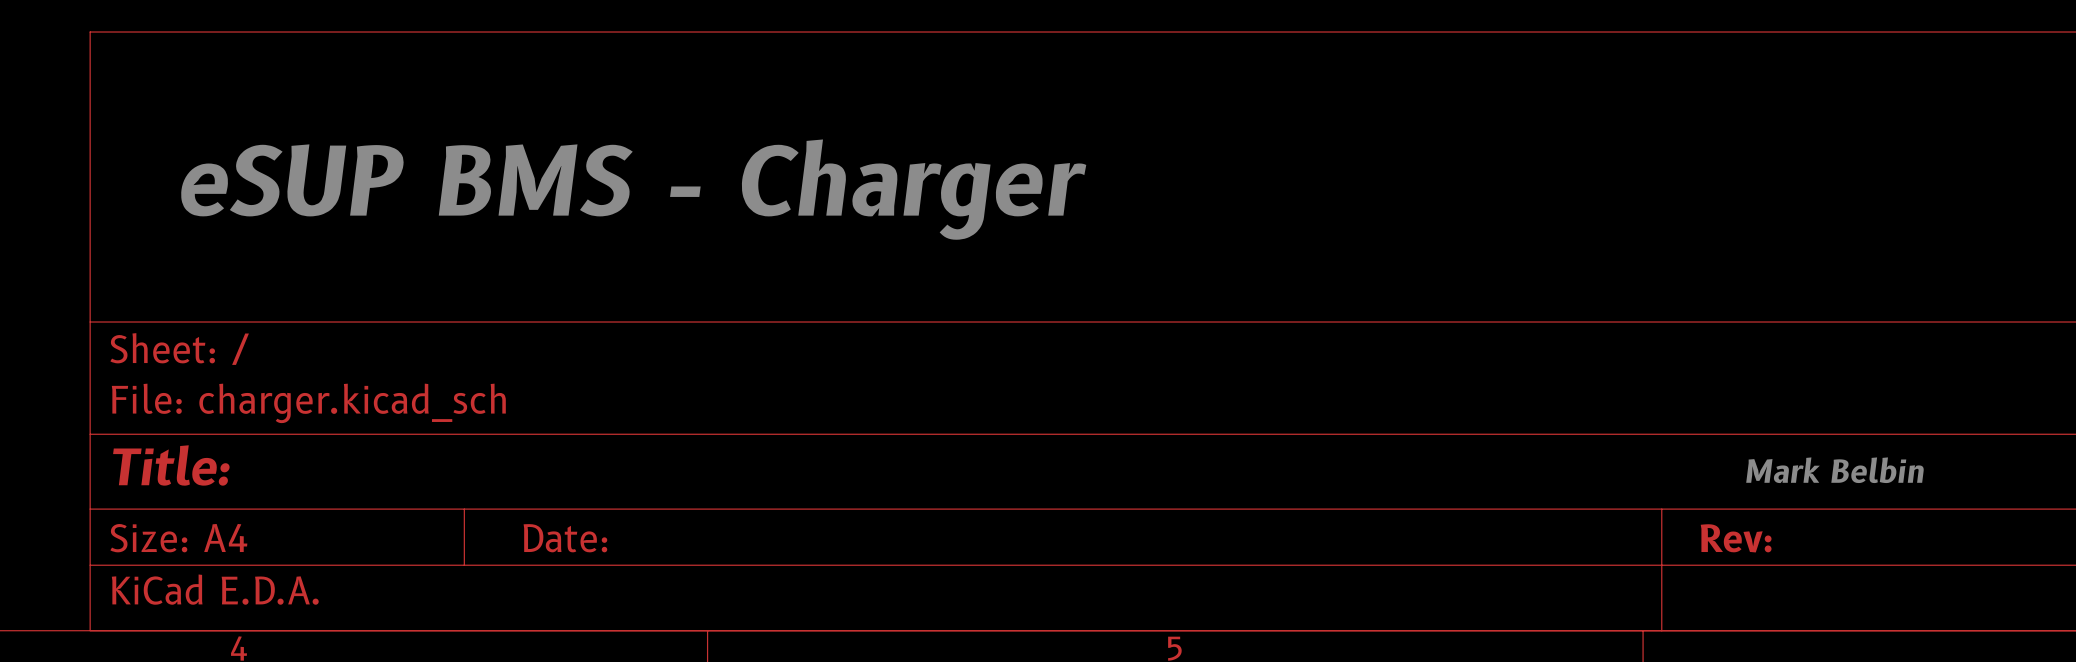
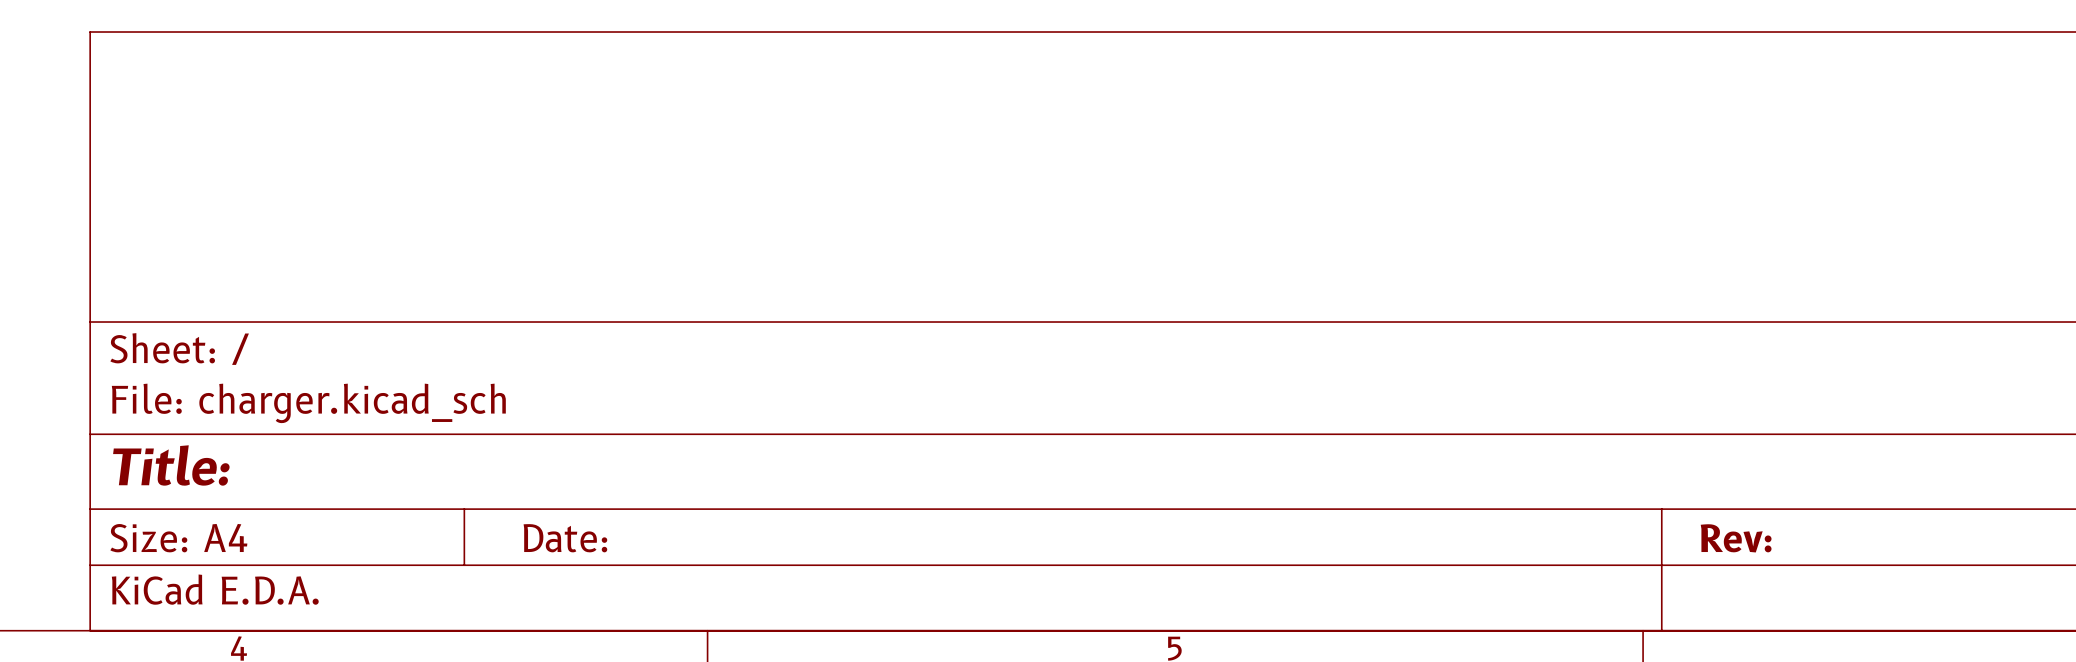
text: eSUP BMS - Charger (633, 189) -> none
text: Mark Belbin (1834, 470) -> none

